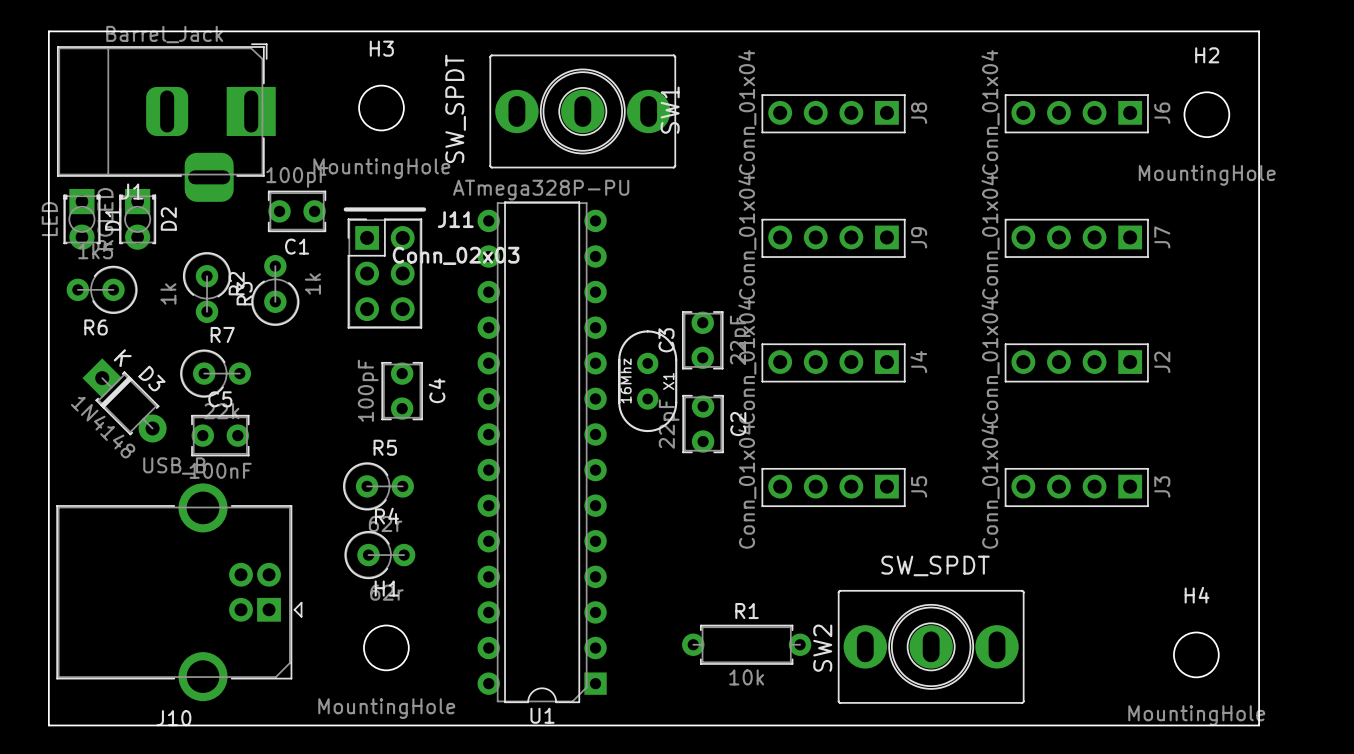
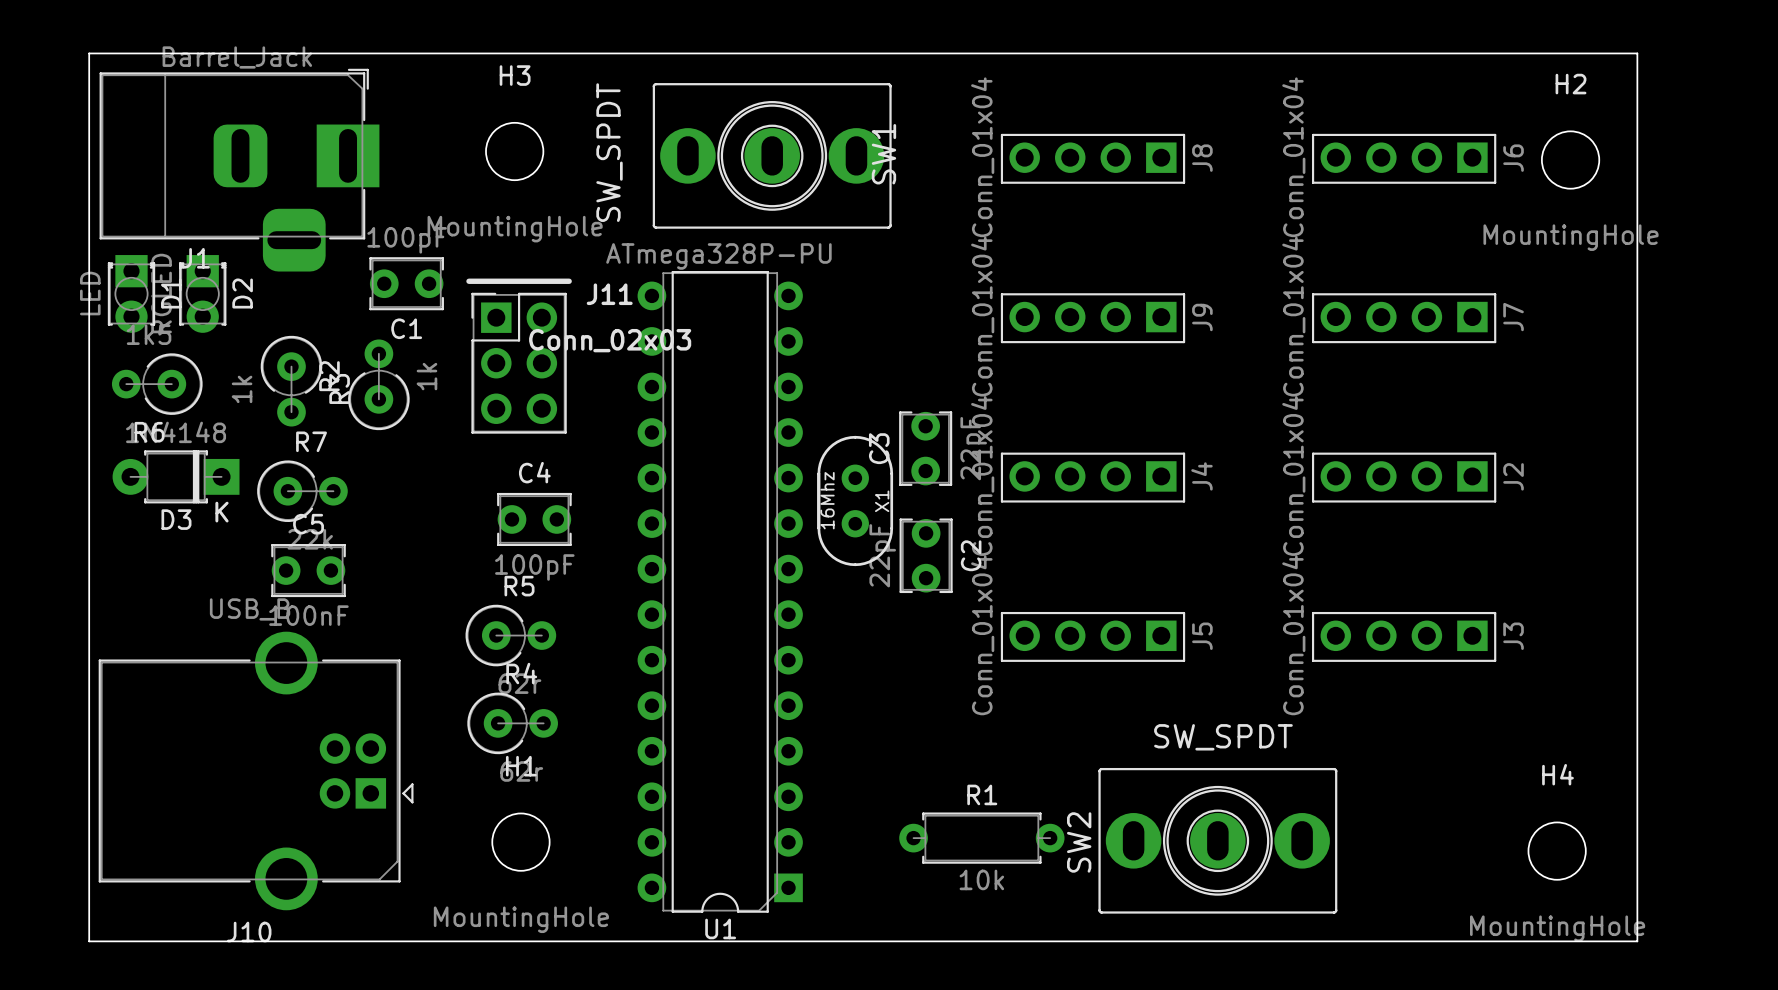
C4 value position: 100pF (368, 390) -> 100pF (534, 567)
C4 name position: C4 (437, 390) -> C4 (534, 472)
C4 rotation: 0° (402, 391) -> 90° clockwise (534, 519)
D3 rotation: 0° (124, 400) -> 135° clockwise (176, 476)

